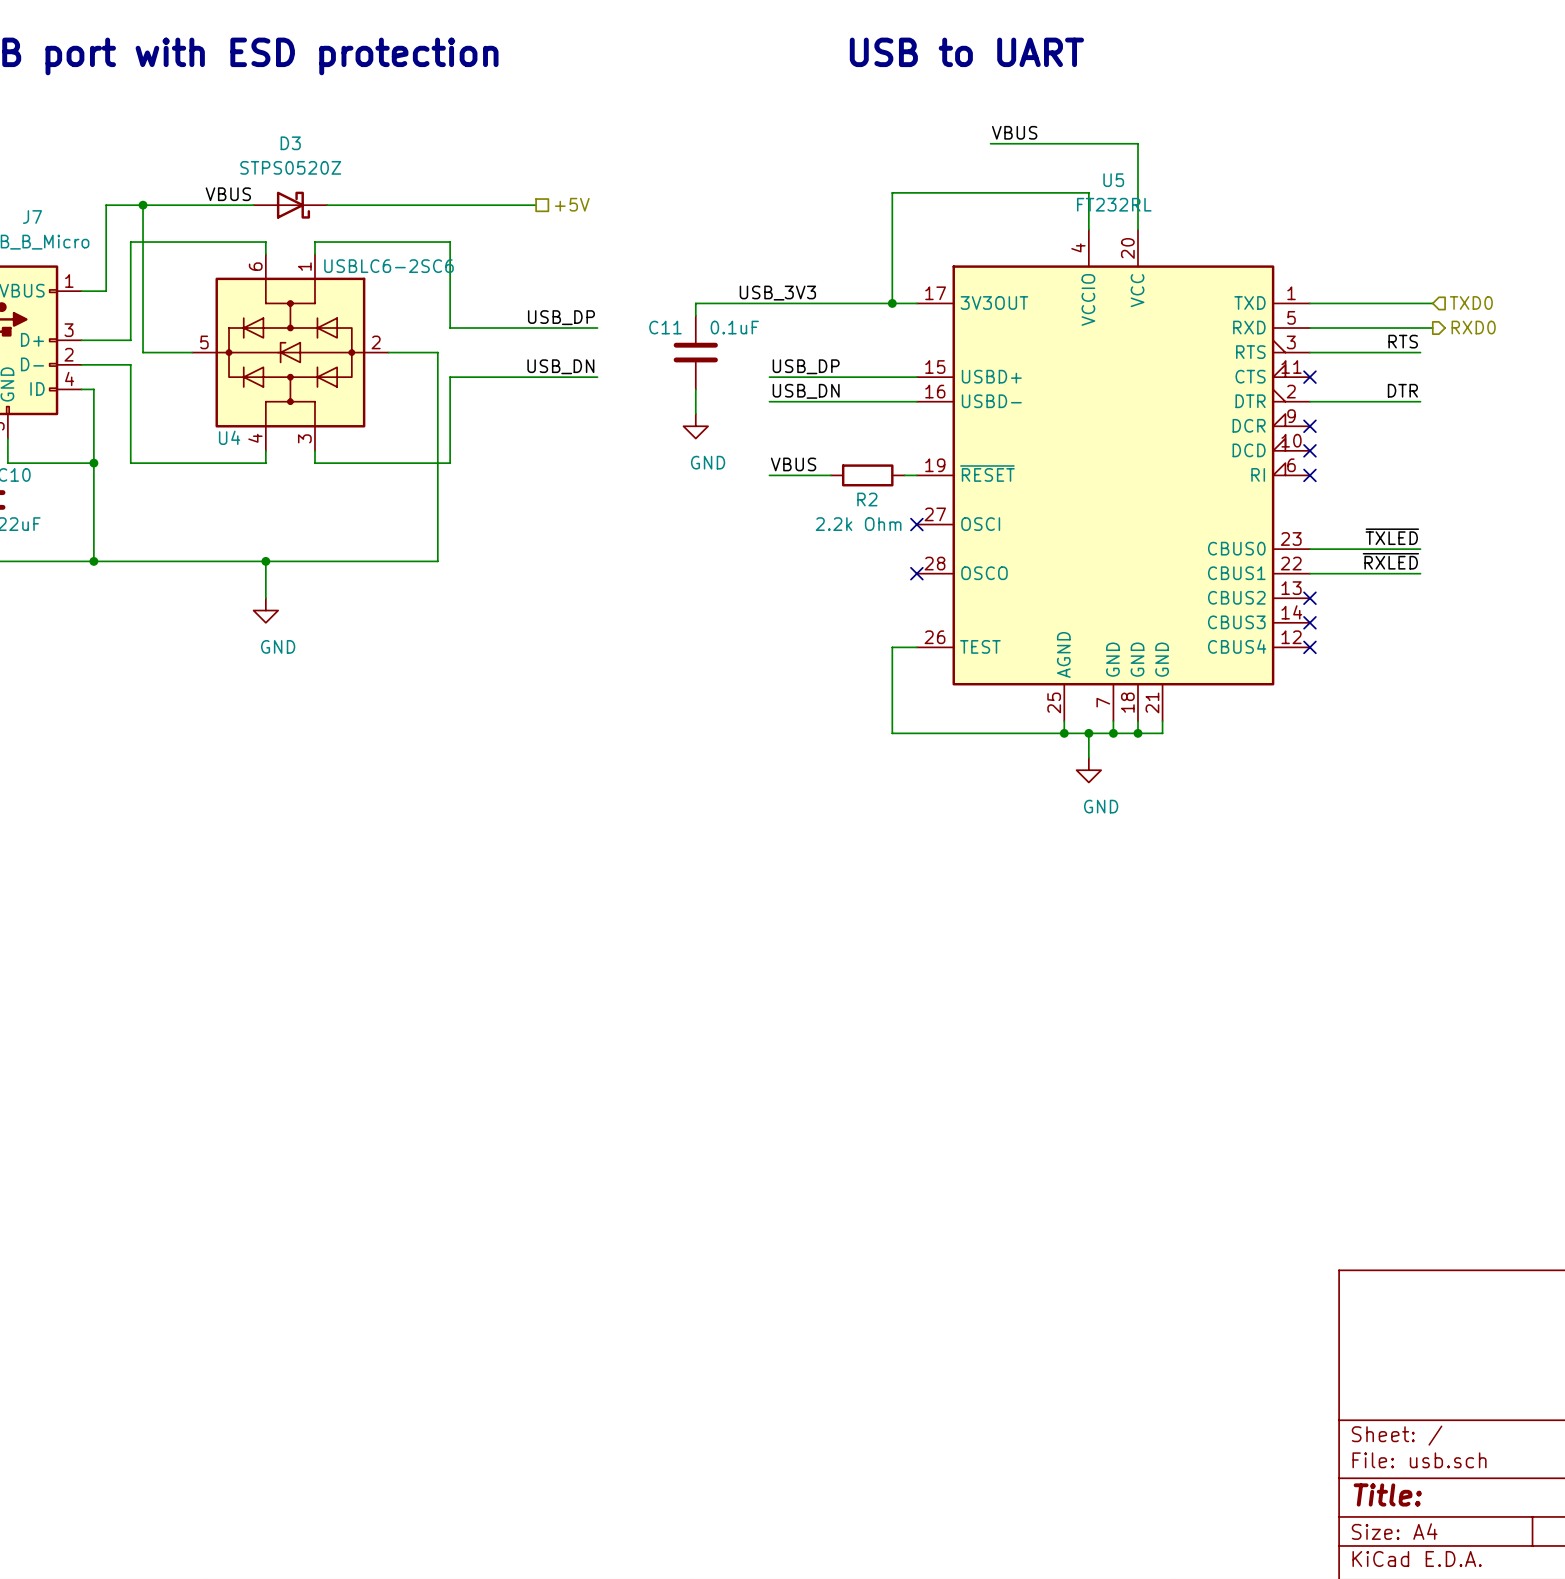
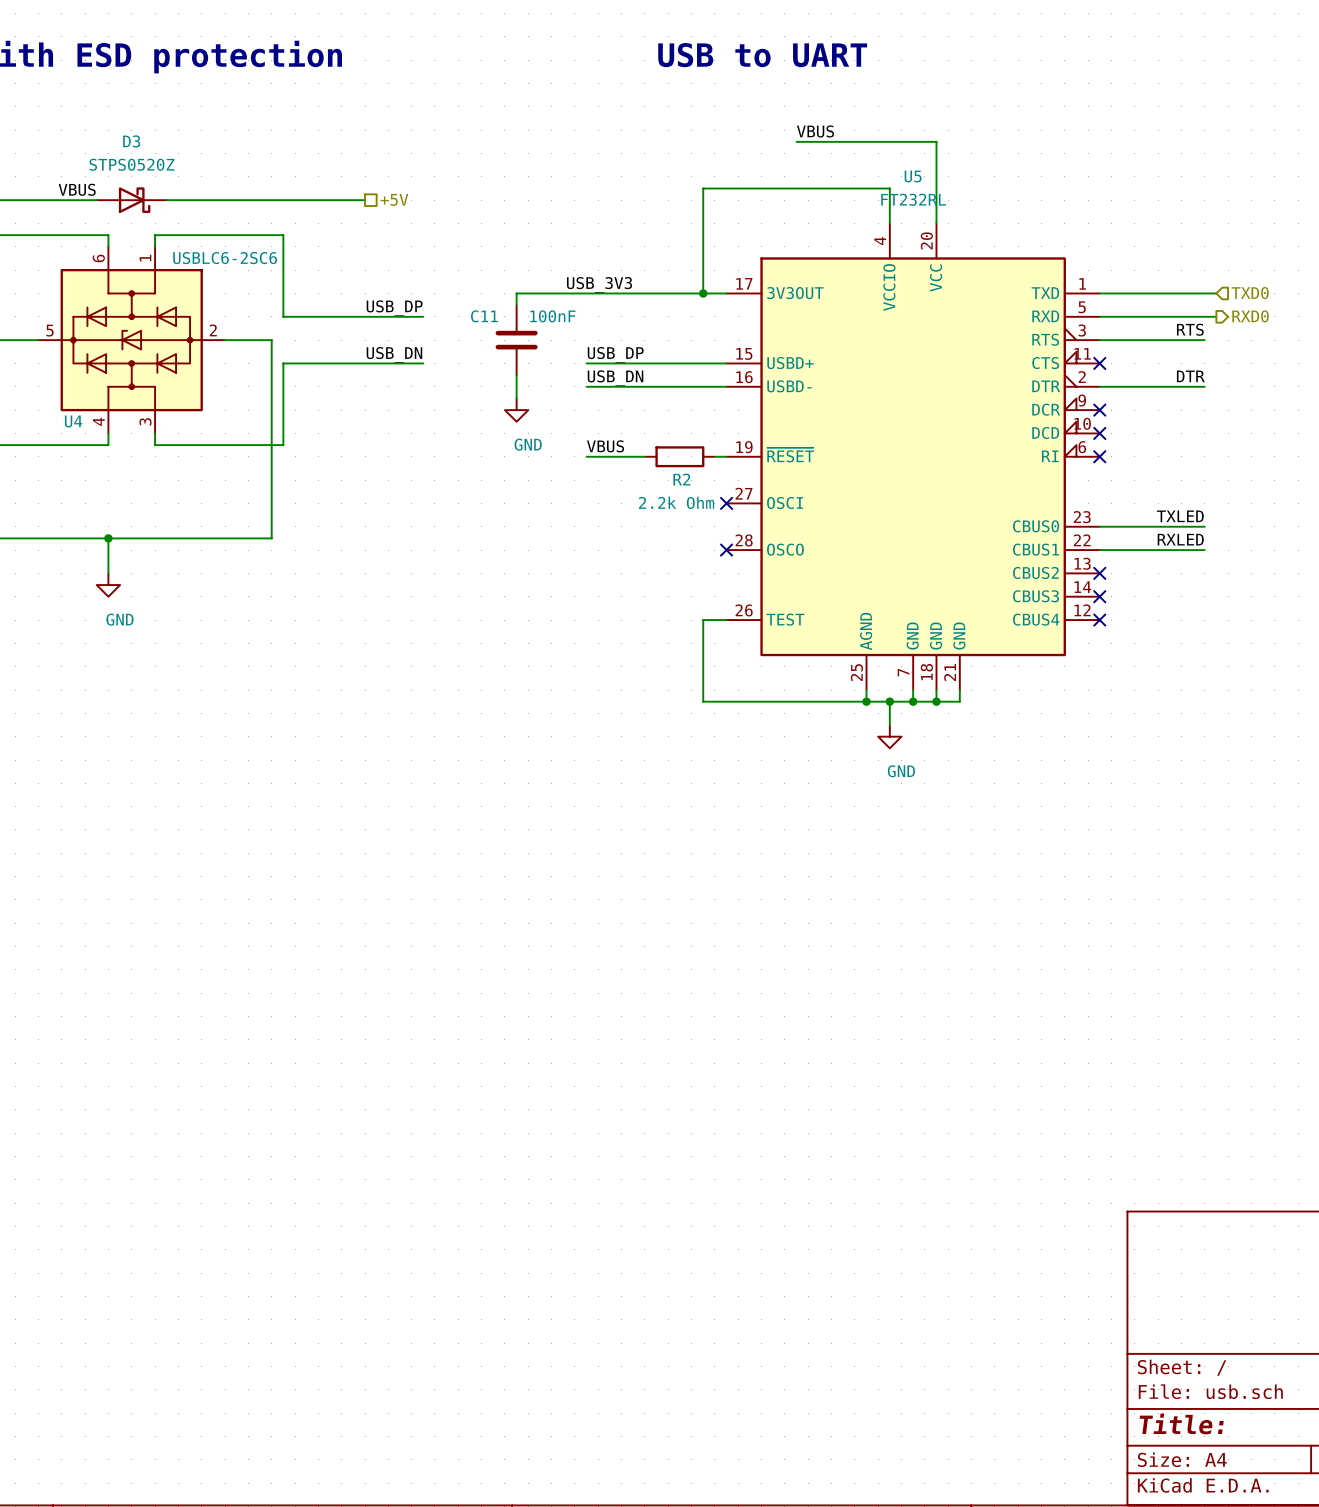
C11 value: 0.1uF (734, 327) -> 100nF (552, 316)
label: ~{TXLED} (1392, 536) -> TXLED (1180, 516)
label: ~{RXLED} (1390, 561) -> RXLED (1180, 539)

